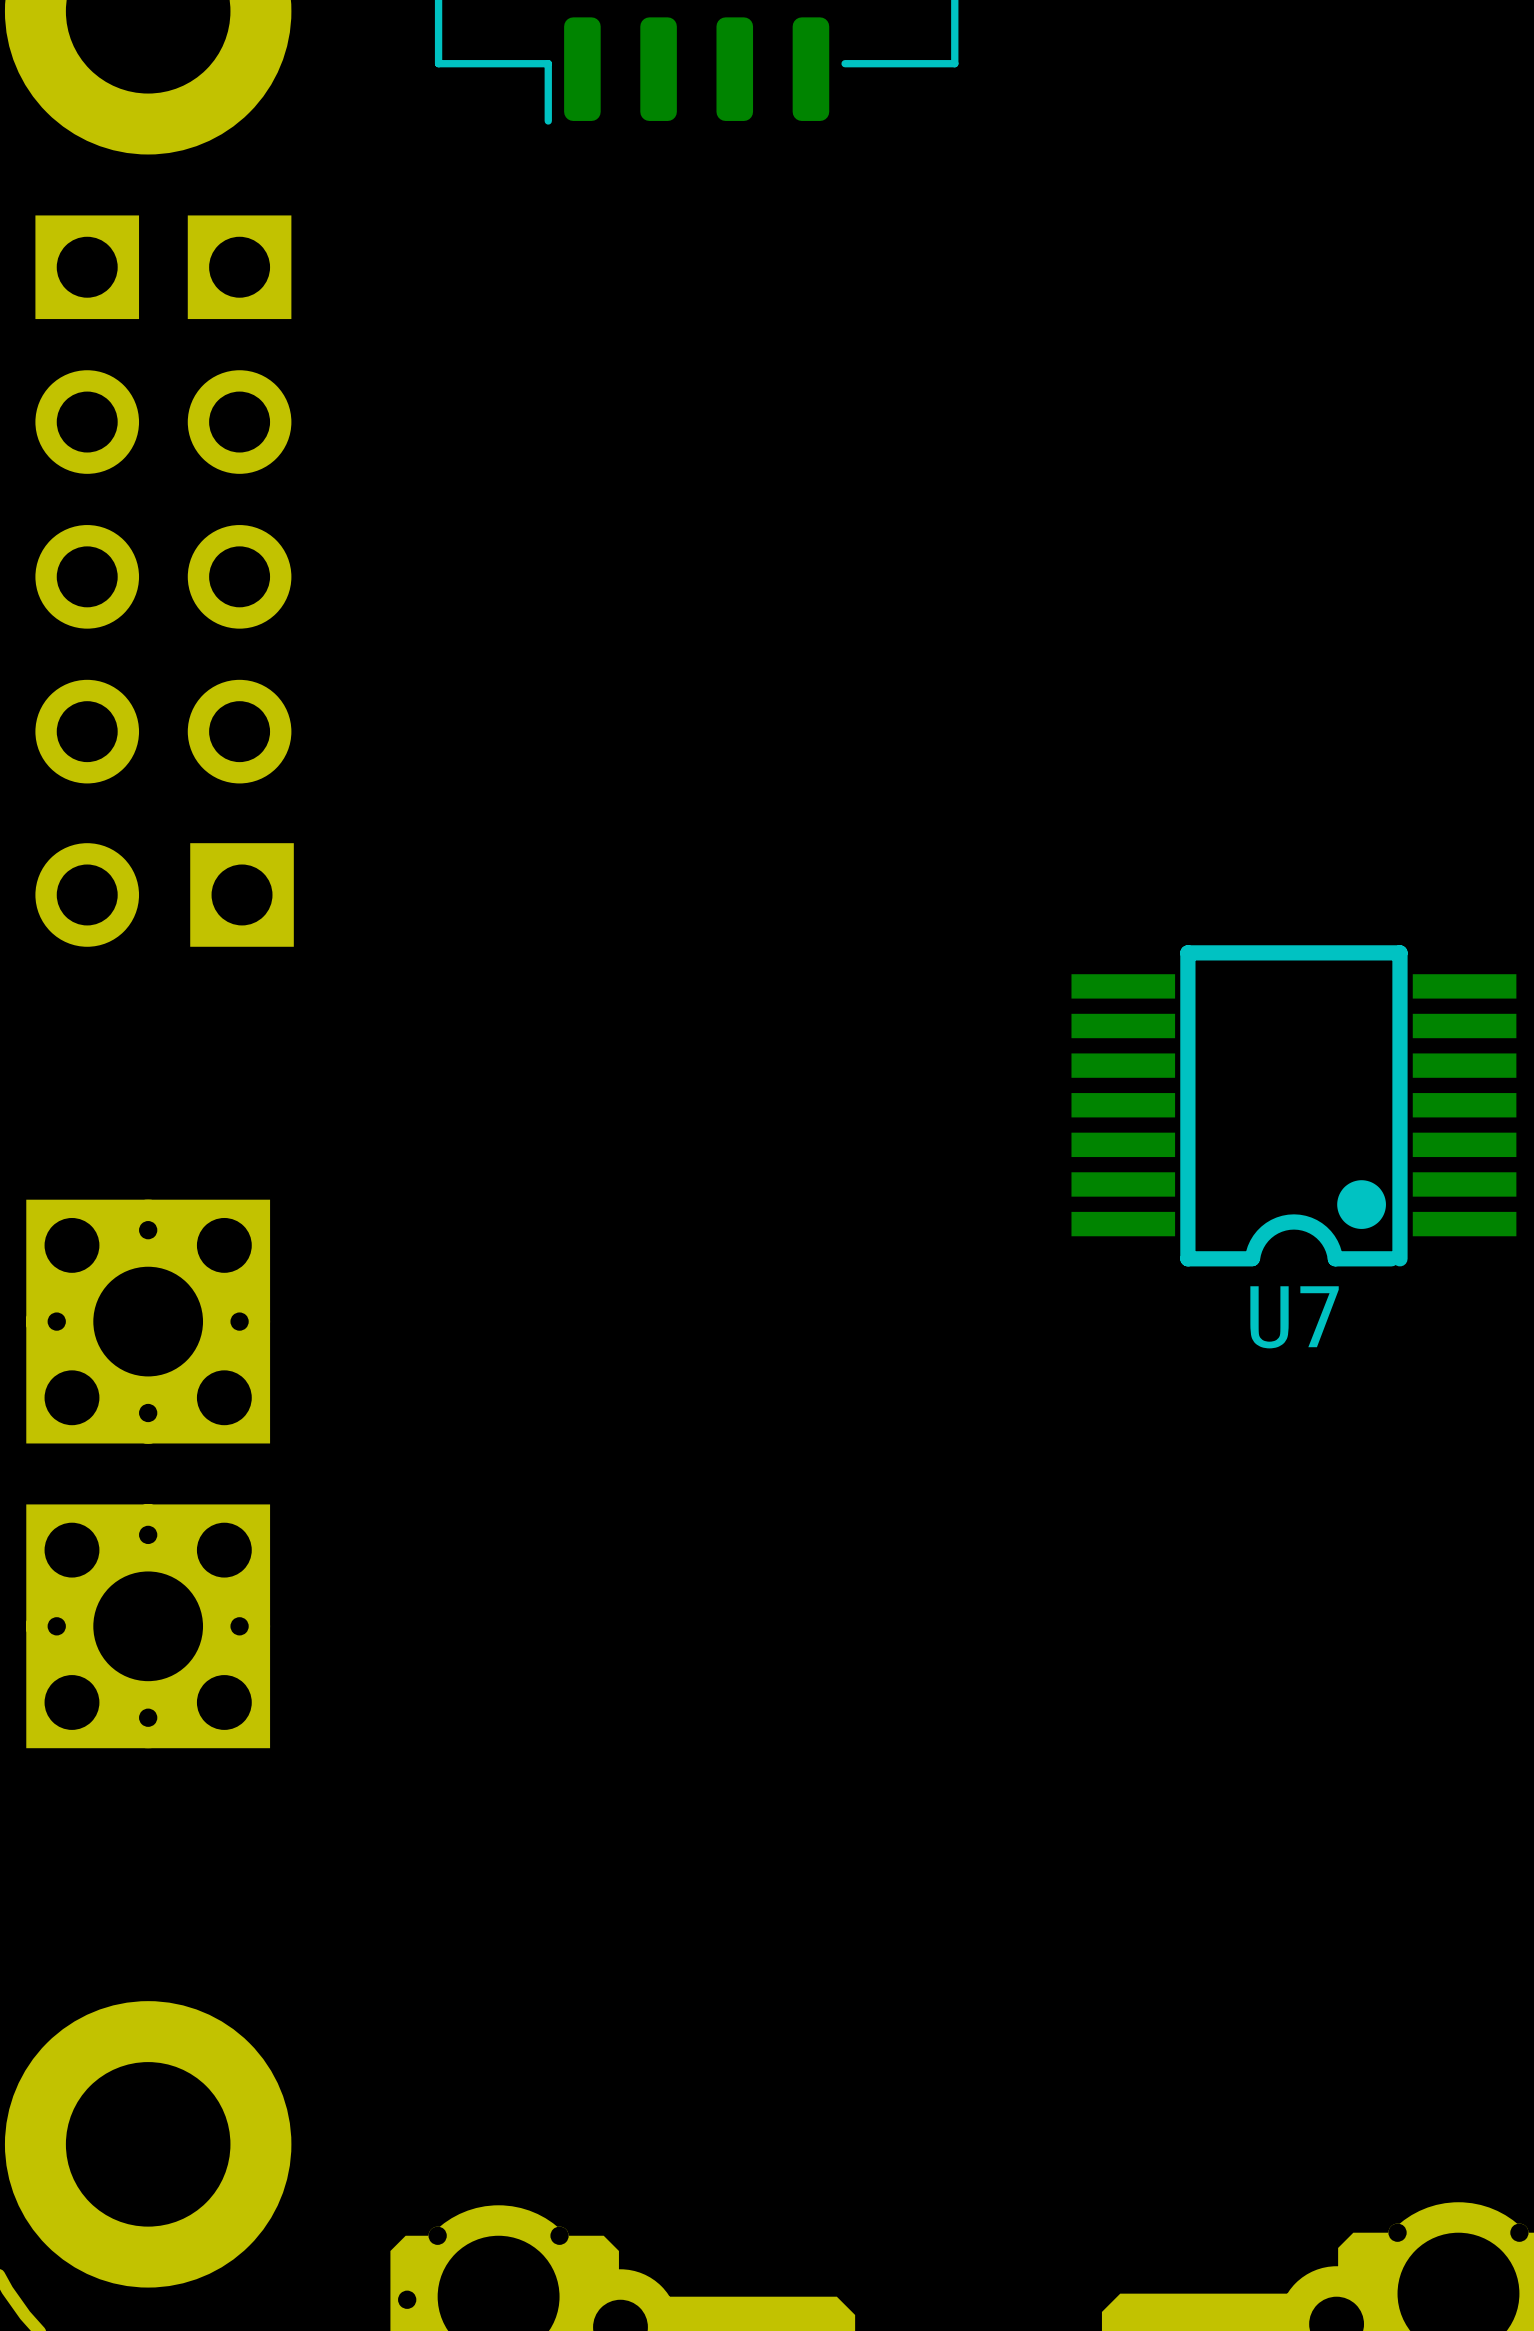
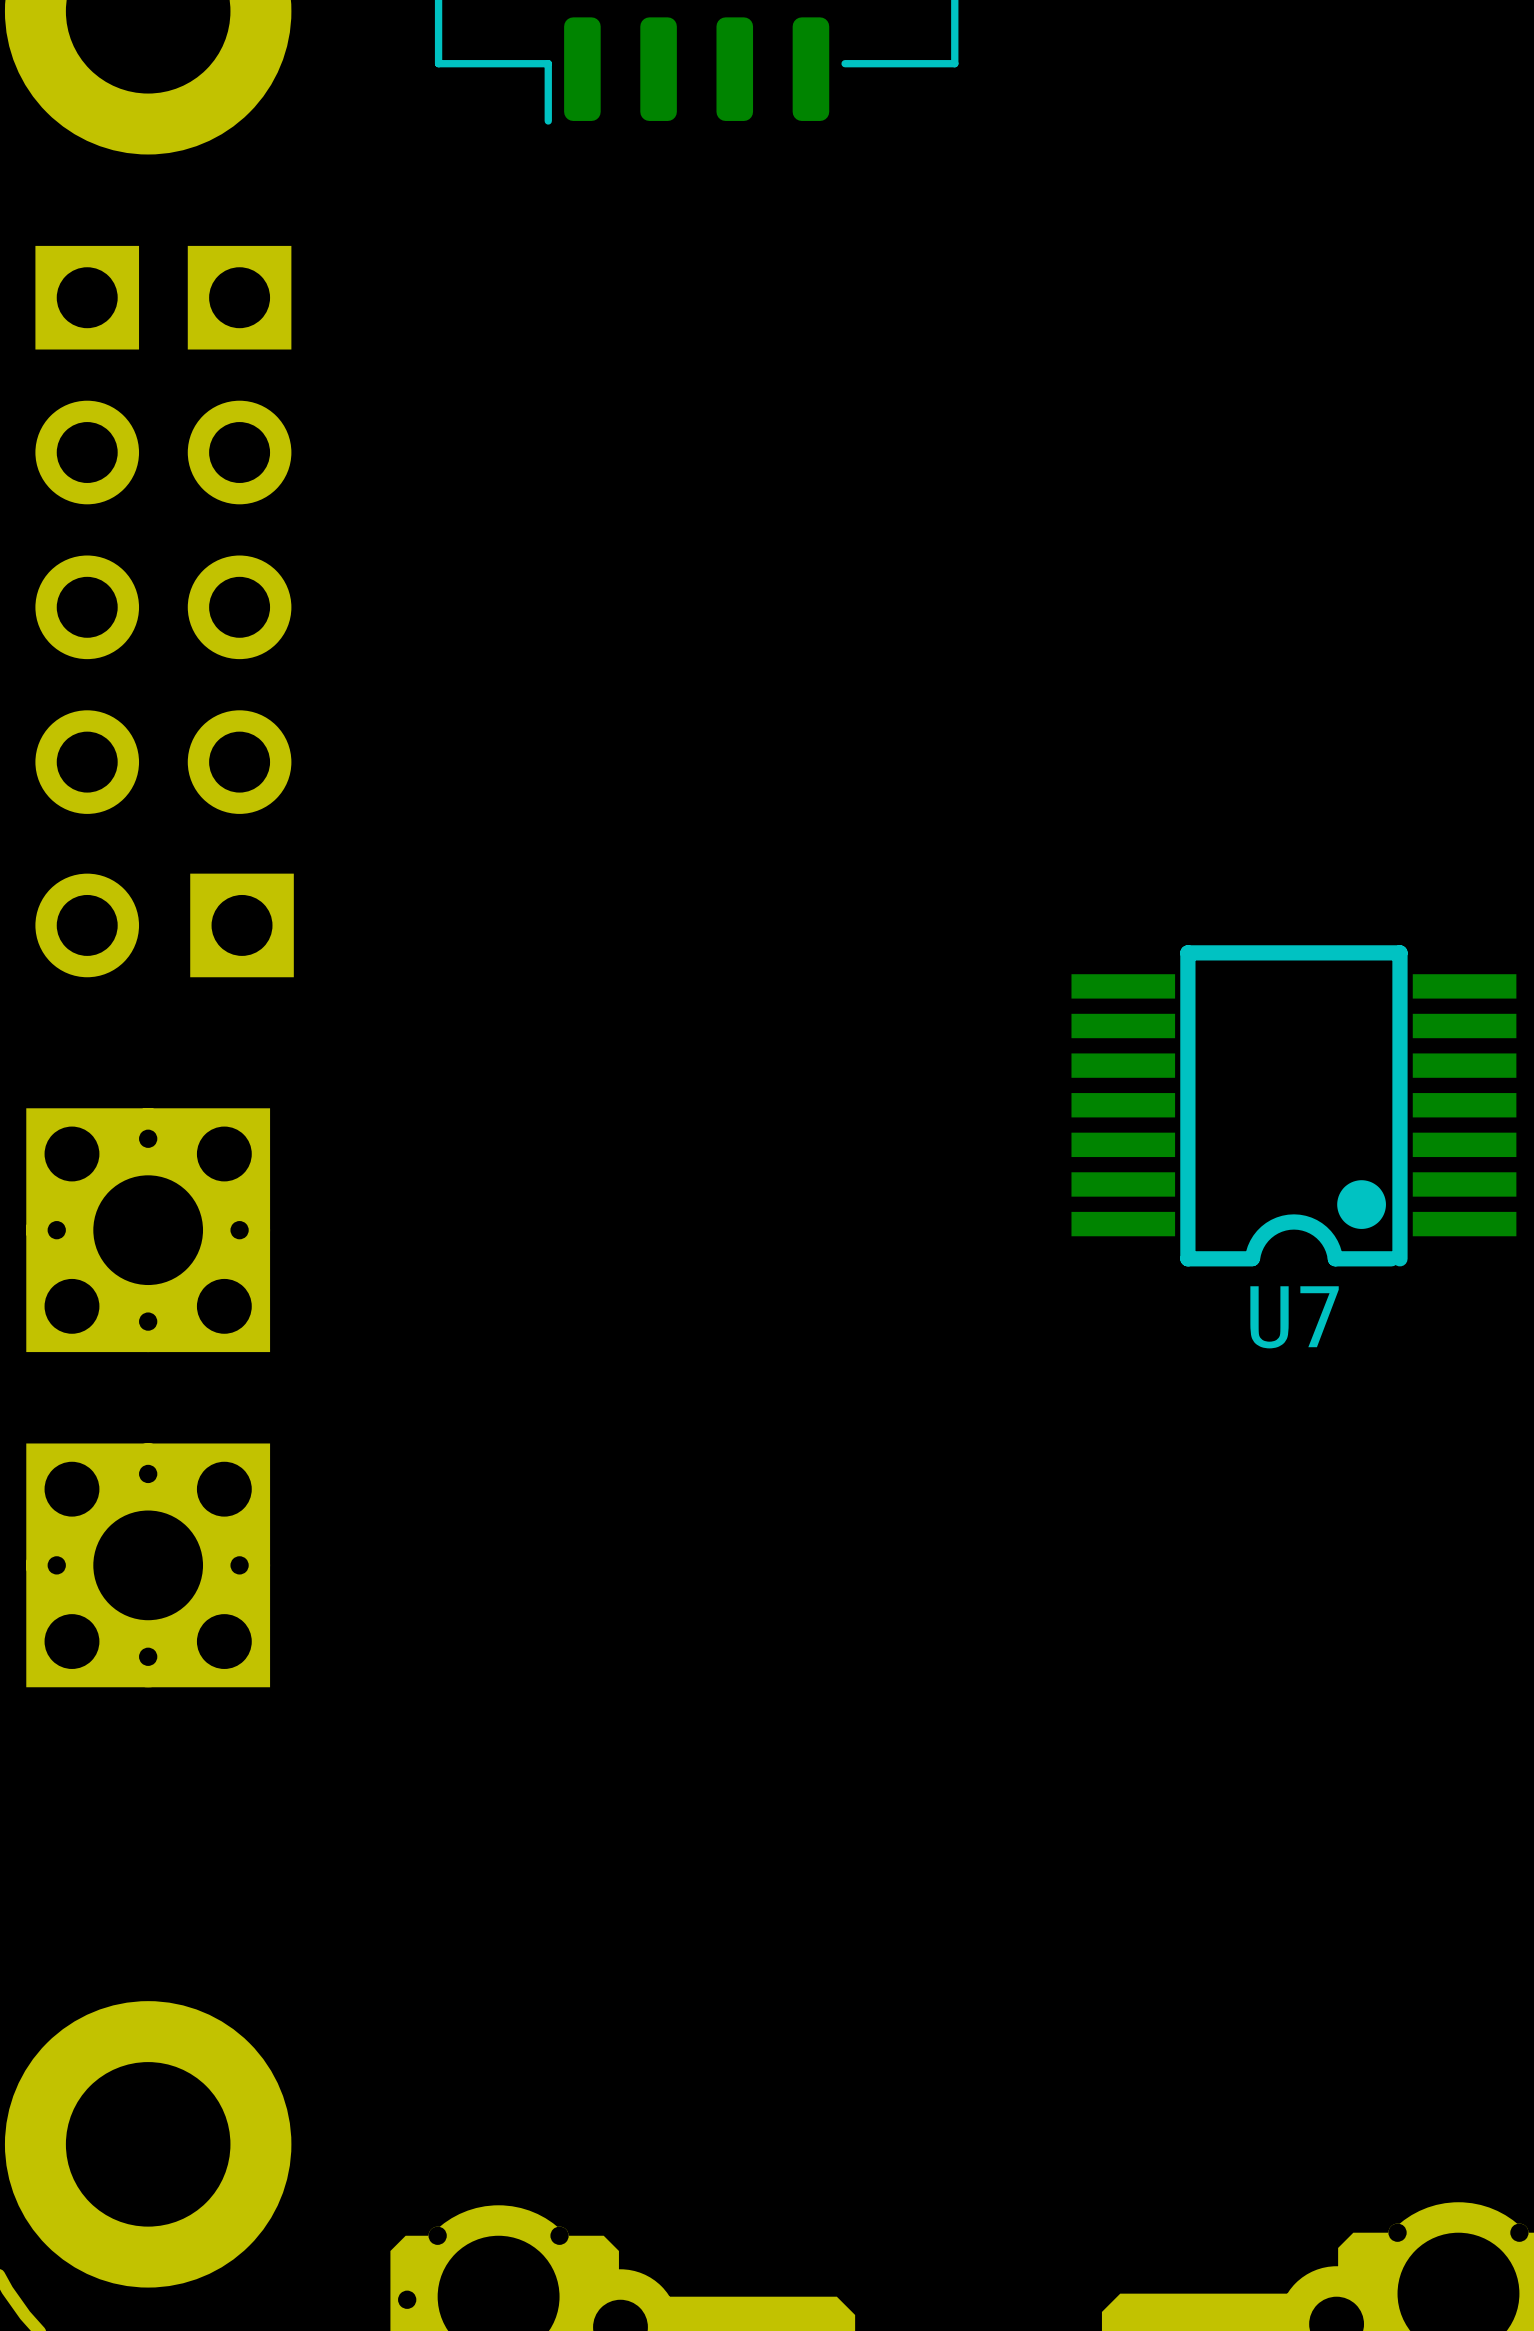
part position: (87, 499) -> (87, 529)
part position: (239, 499) -> (239, 529)
part position: (164, 894) -> (164, 925)
part position: (148, 1321) -> (148, 1230)
part position: (148, 1626) -> (148, 1565)

